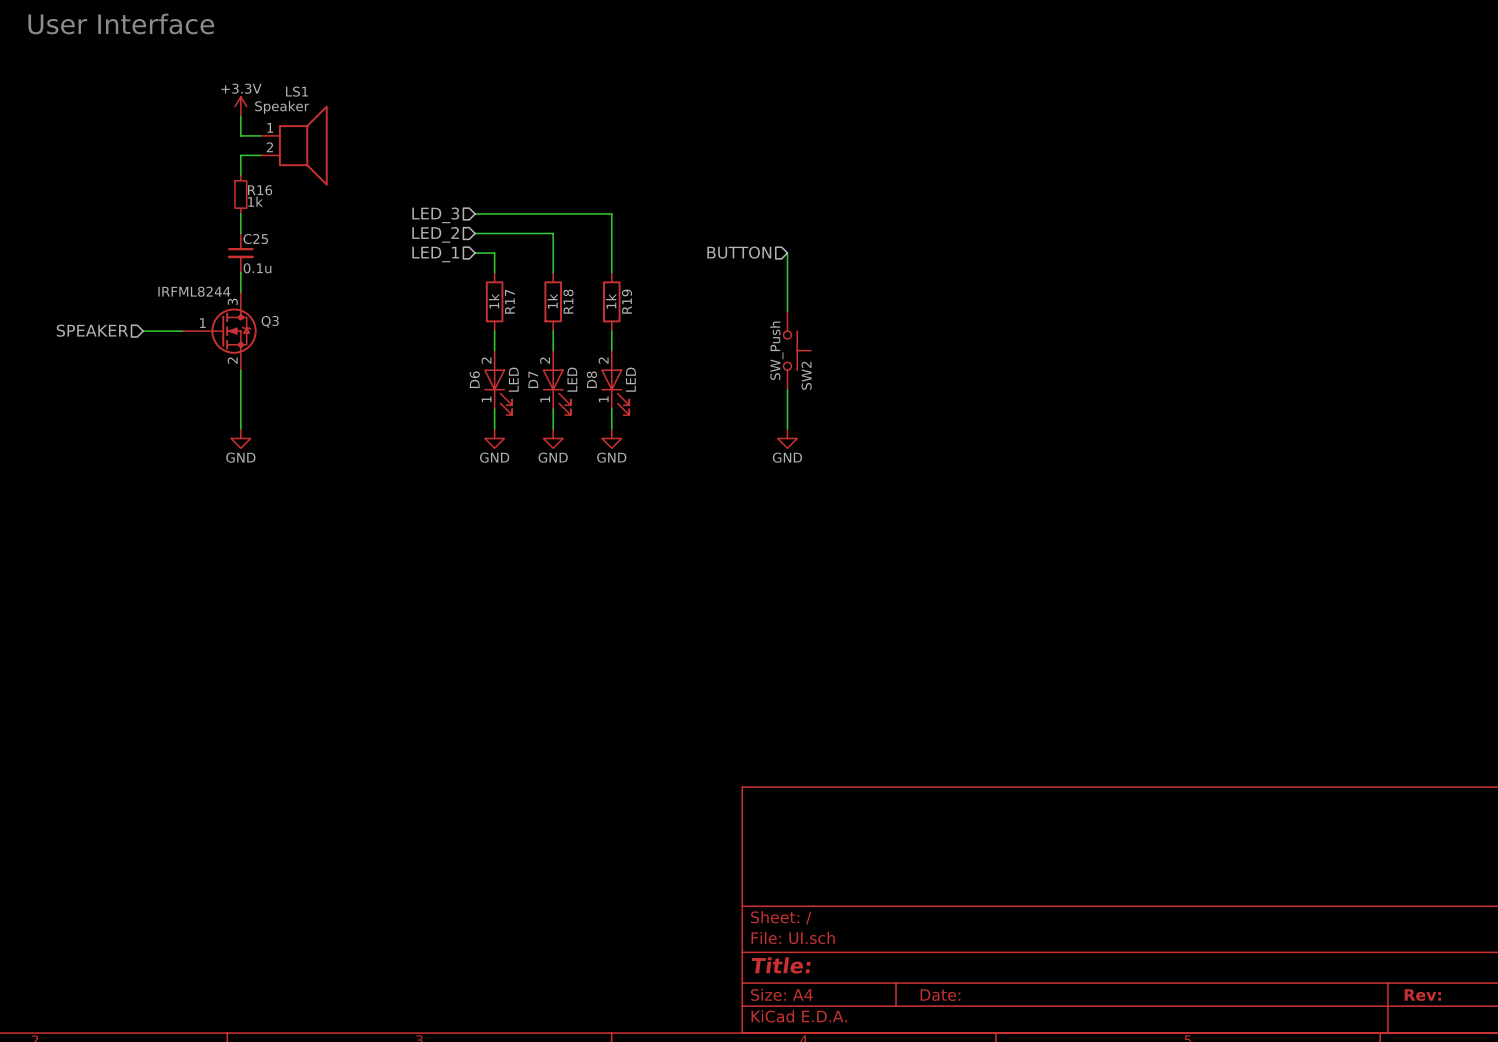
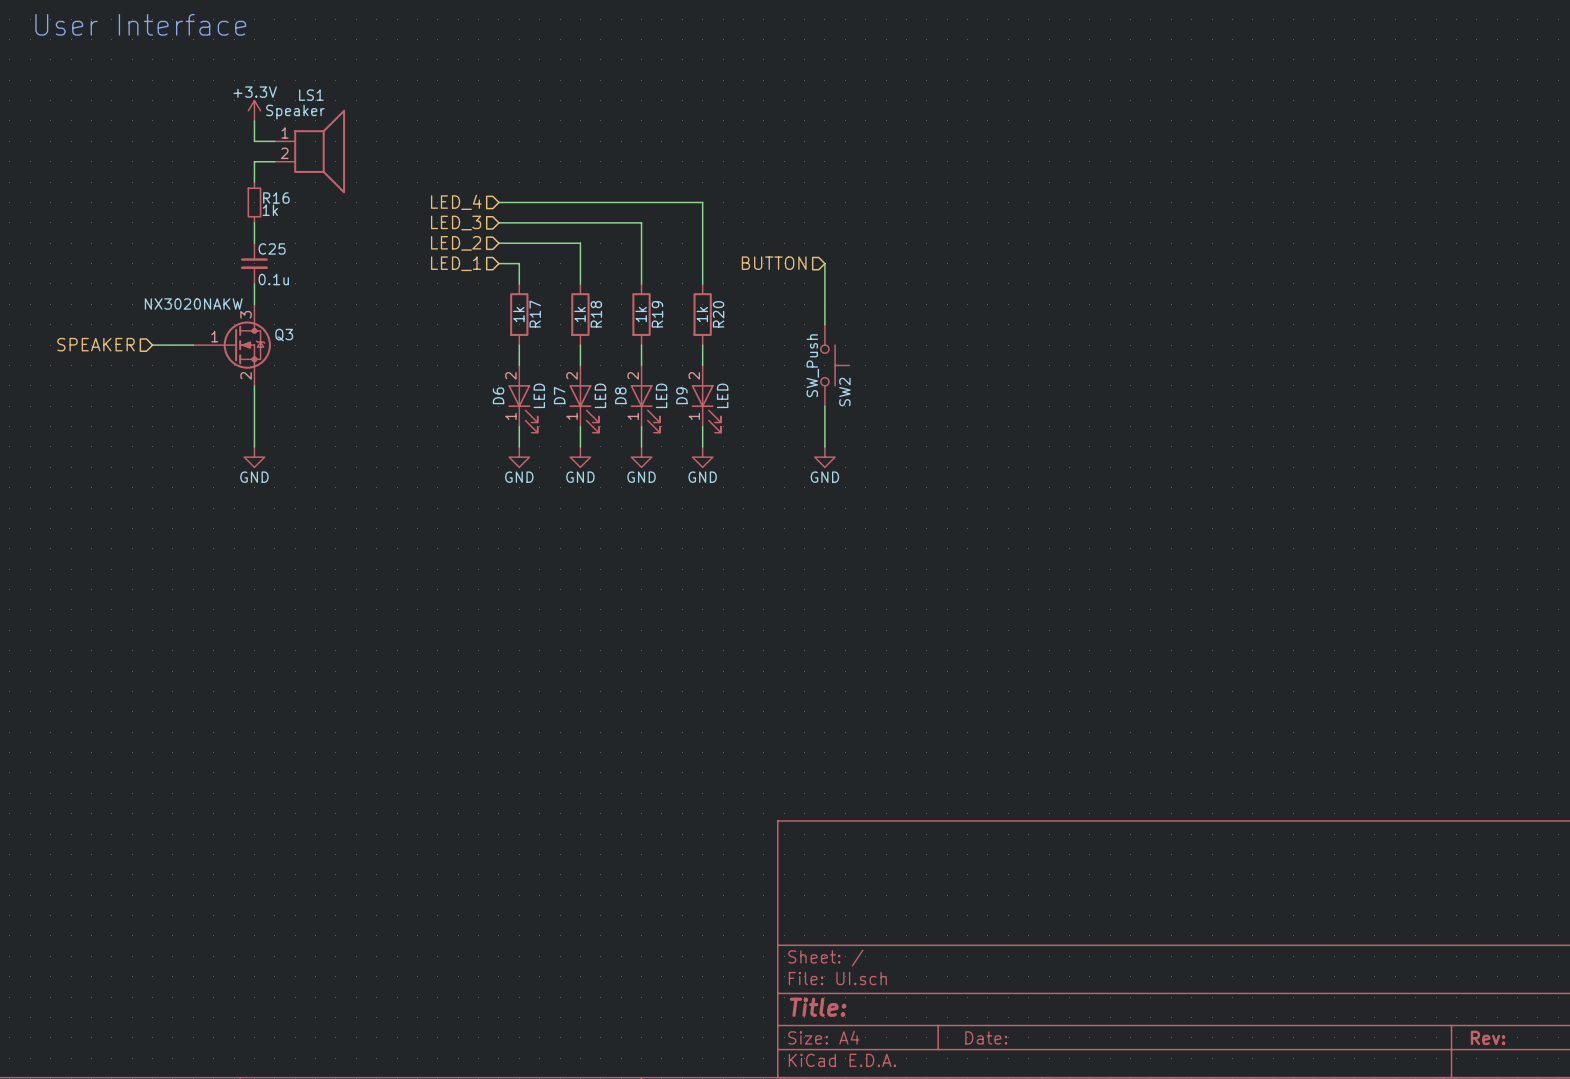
wire: none -> (498, 202) (702, 202) (702, 283)
hierarchical label: none -> LED_4 (456, 202)
Q3 value: IRFML8244 (194, 291) -> NX3020NAKW (193, 303)
R20: none -> 1k (702, 314)
wire: none -> (702, 345) (702, 365)
D9: none -> LED (706, 399)
wire: none -> (702, 426) (702, 446)
power symbol: none -> GND (702, 457)

